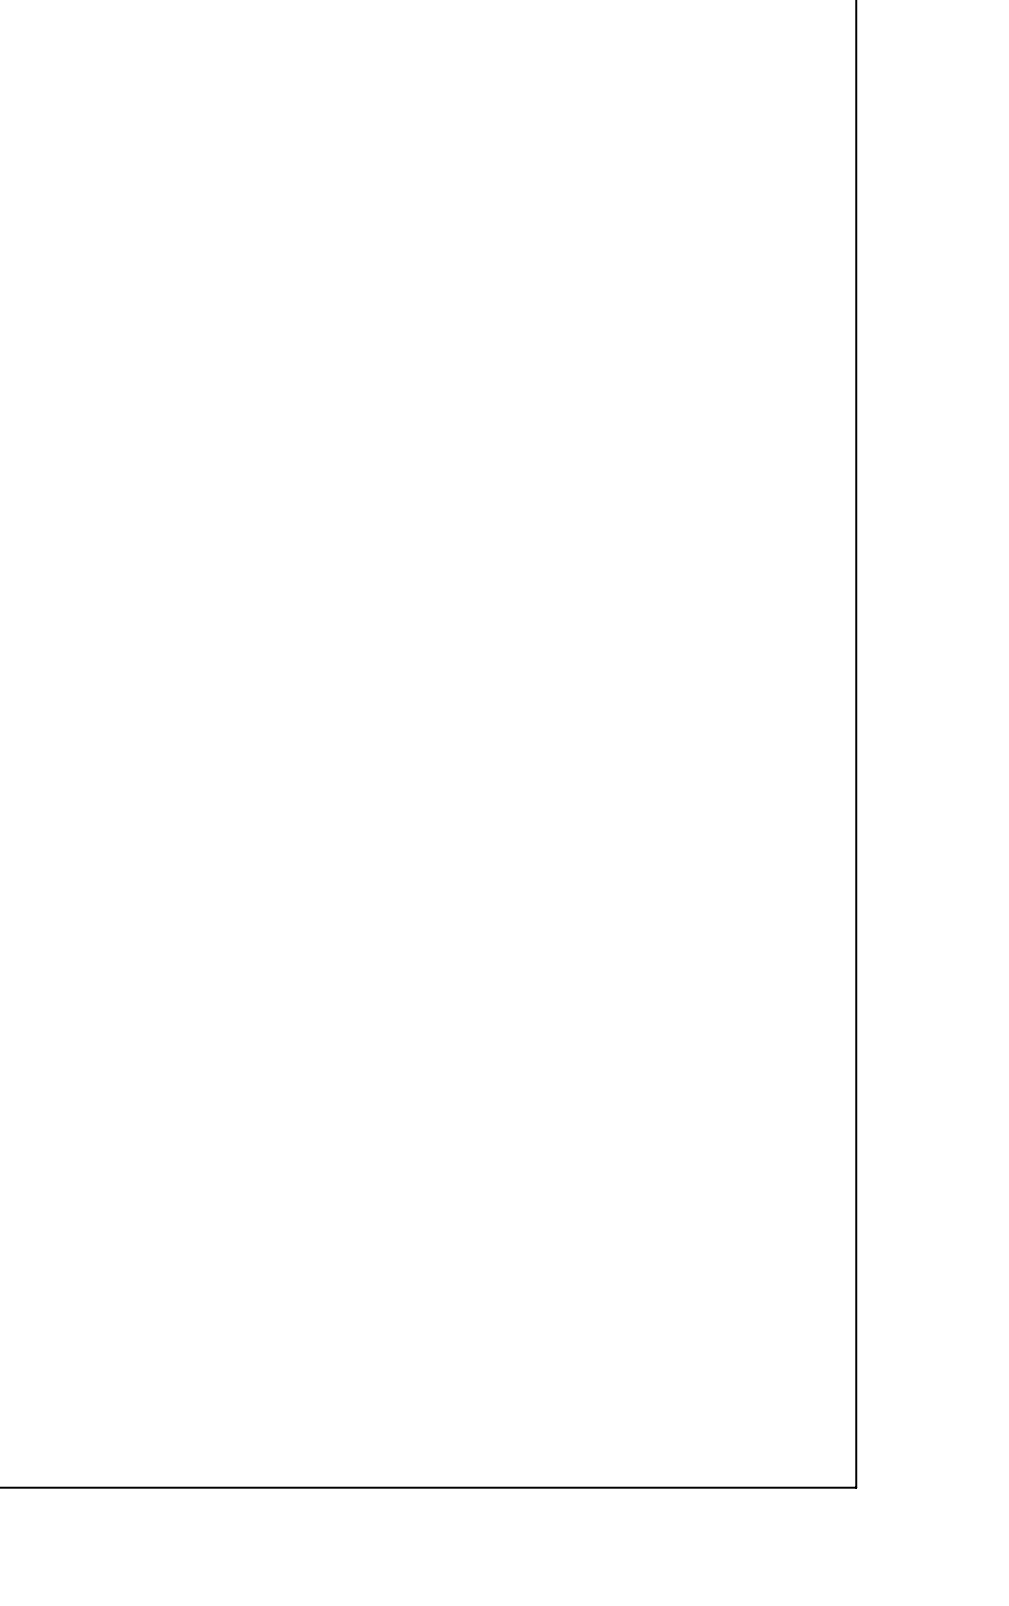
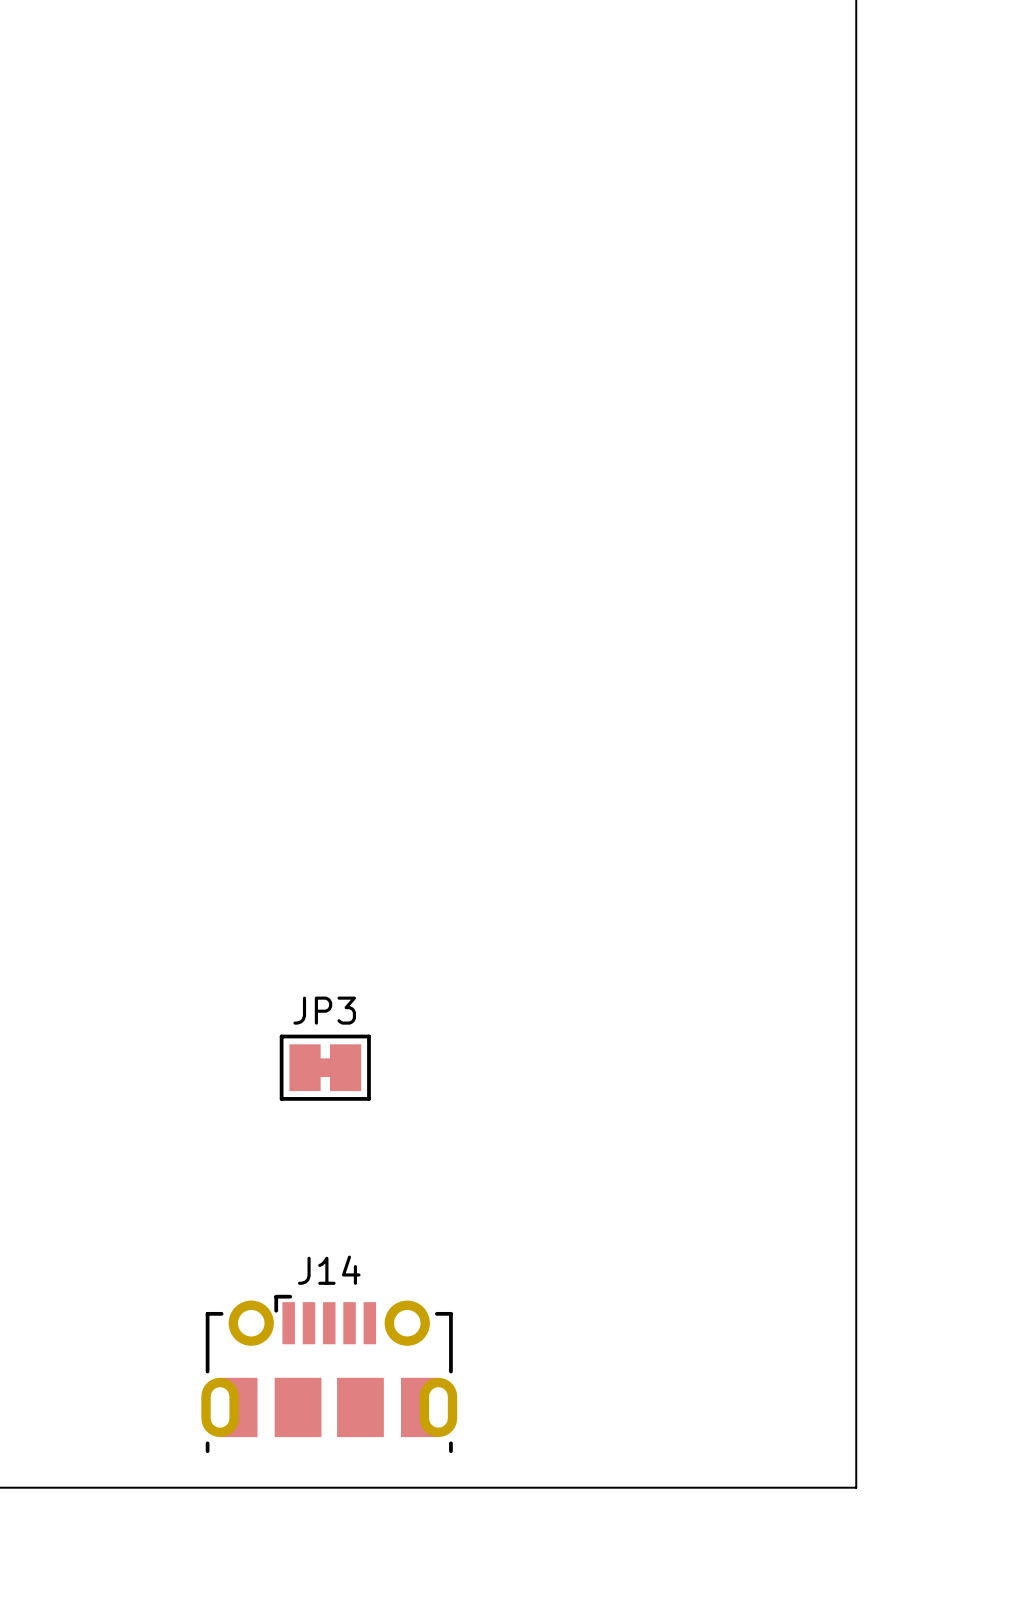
JP3: none -> (325, 1067)
J14: none -> (329, 1373)

